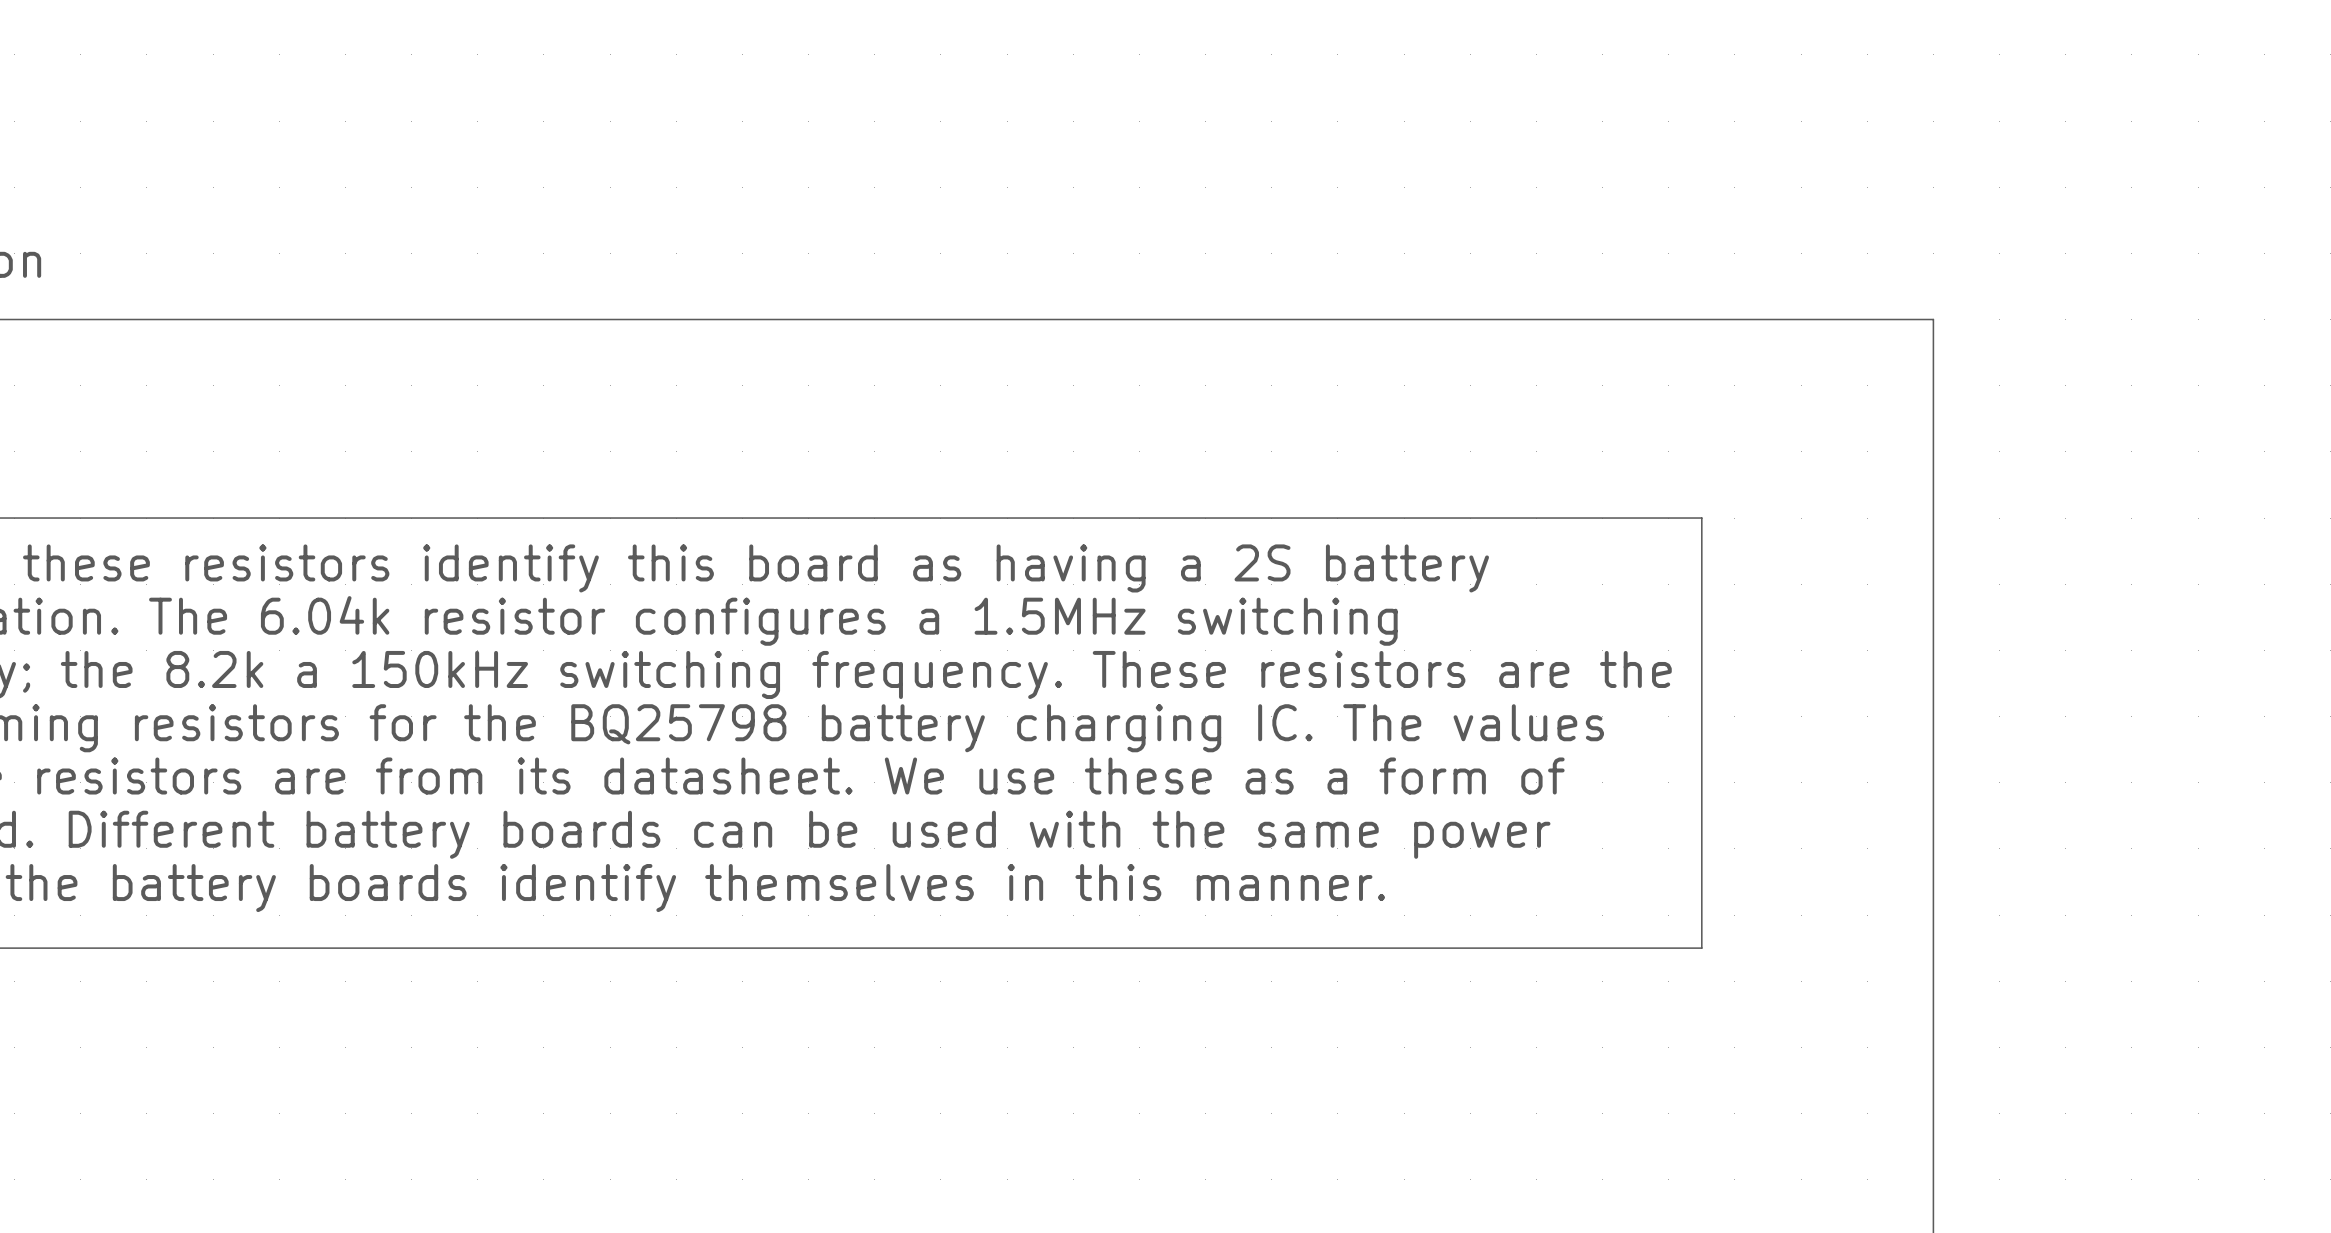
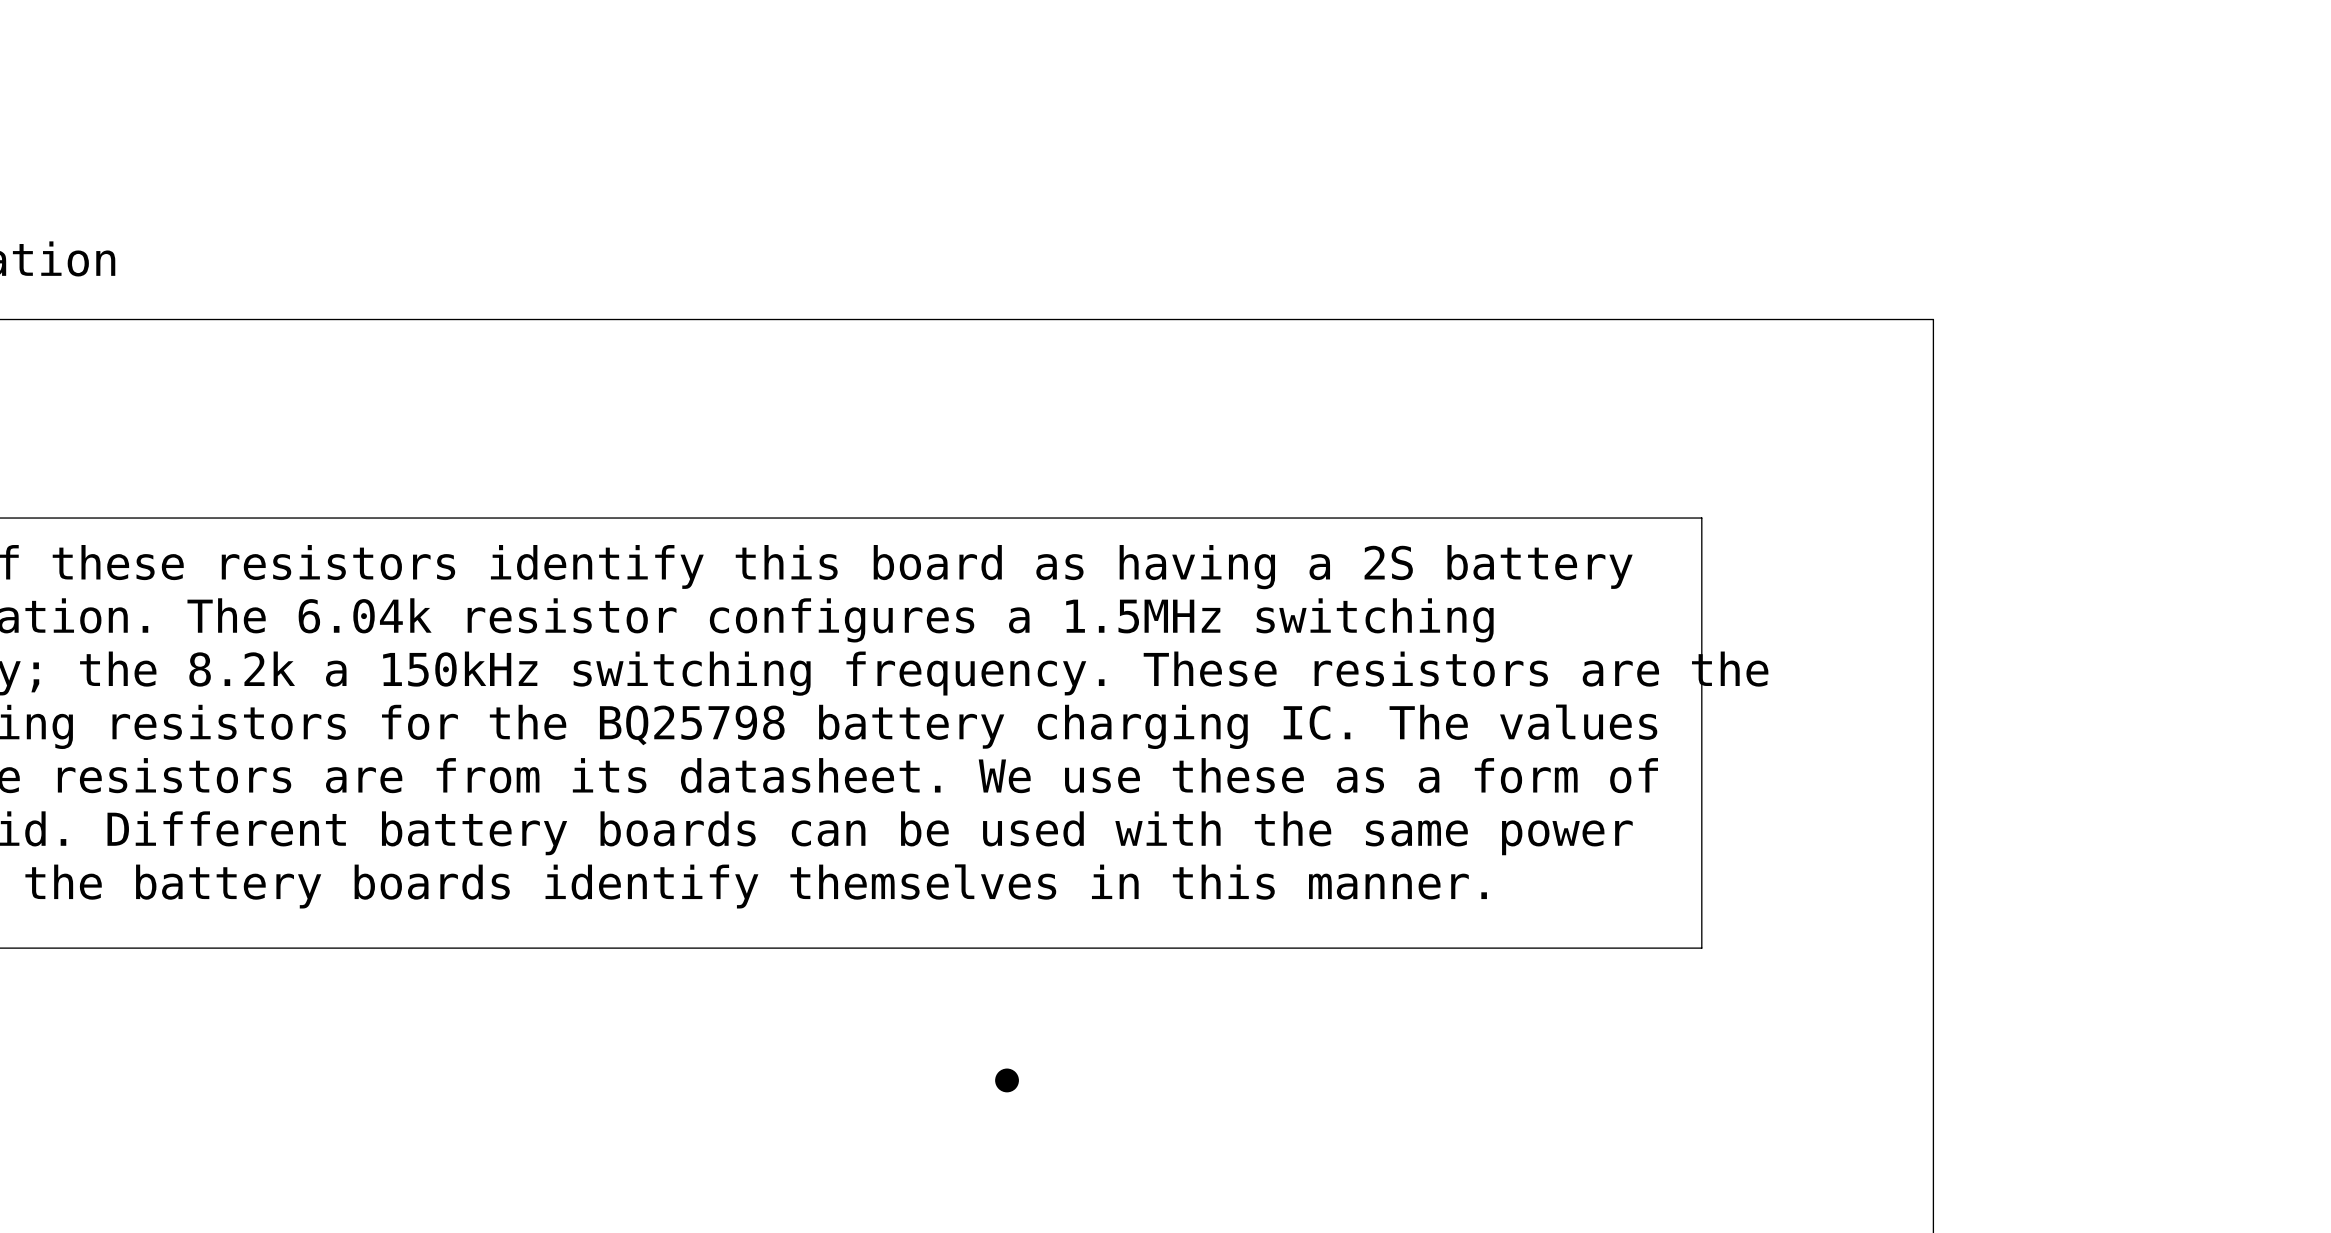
junction: none -> (1007, 1080)

